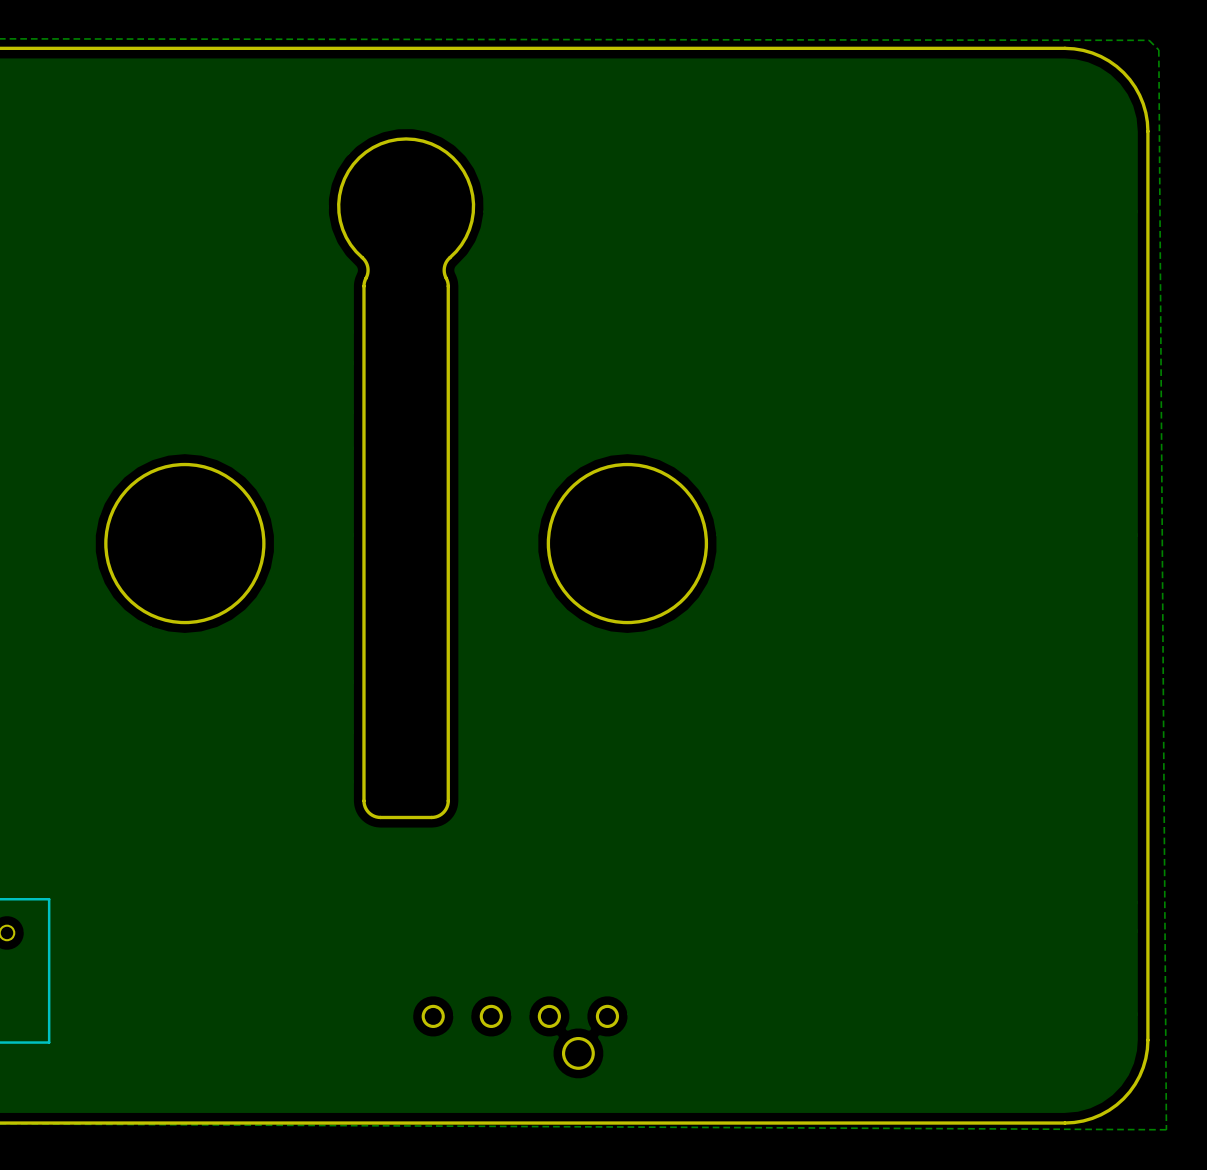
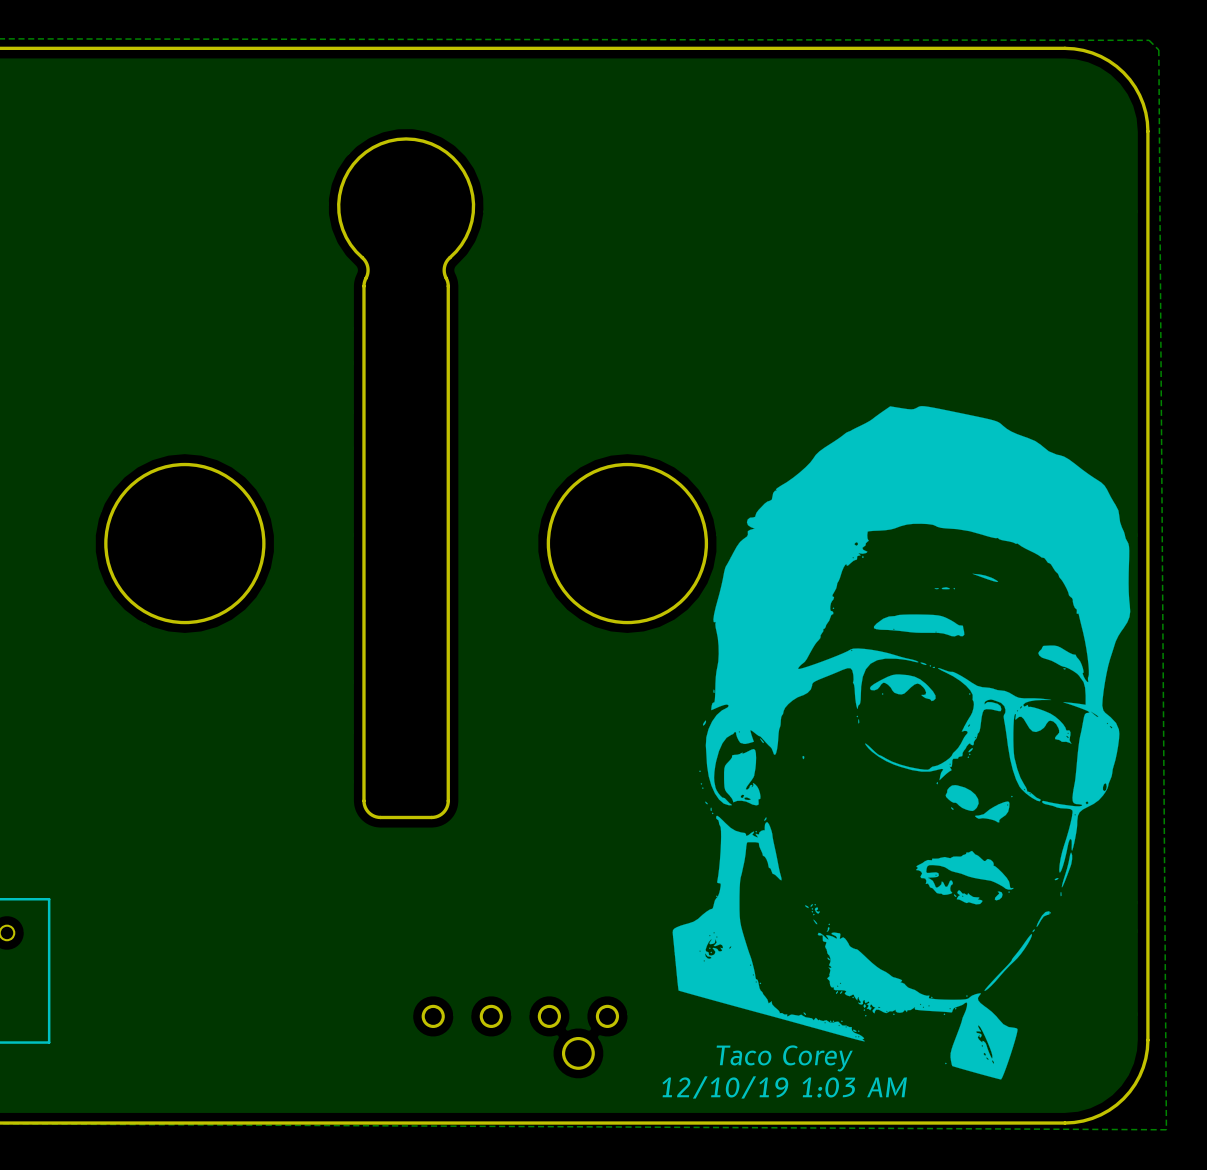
drawing: none -> [672, 406, 1131, 1080]
text: none -> Taco Corey (784, 1058)
text: none -> 12/10/19 1:03 AM (784, 1087)

